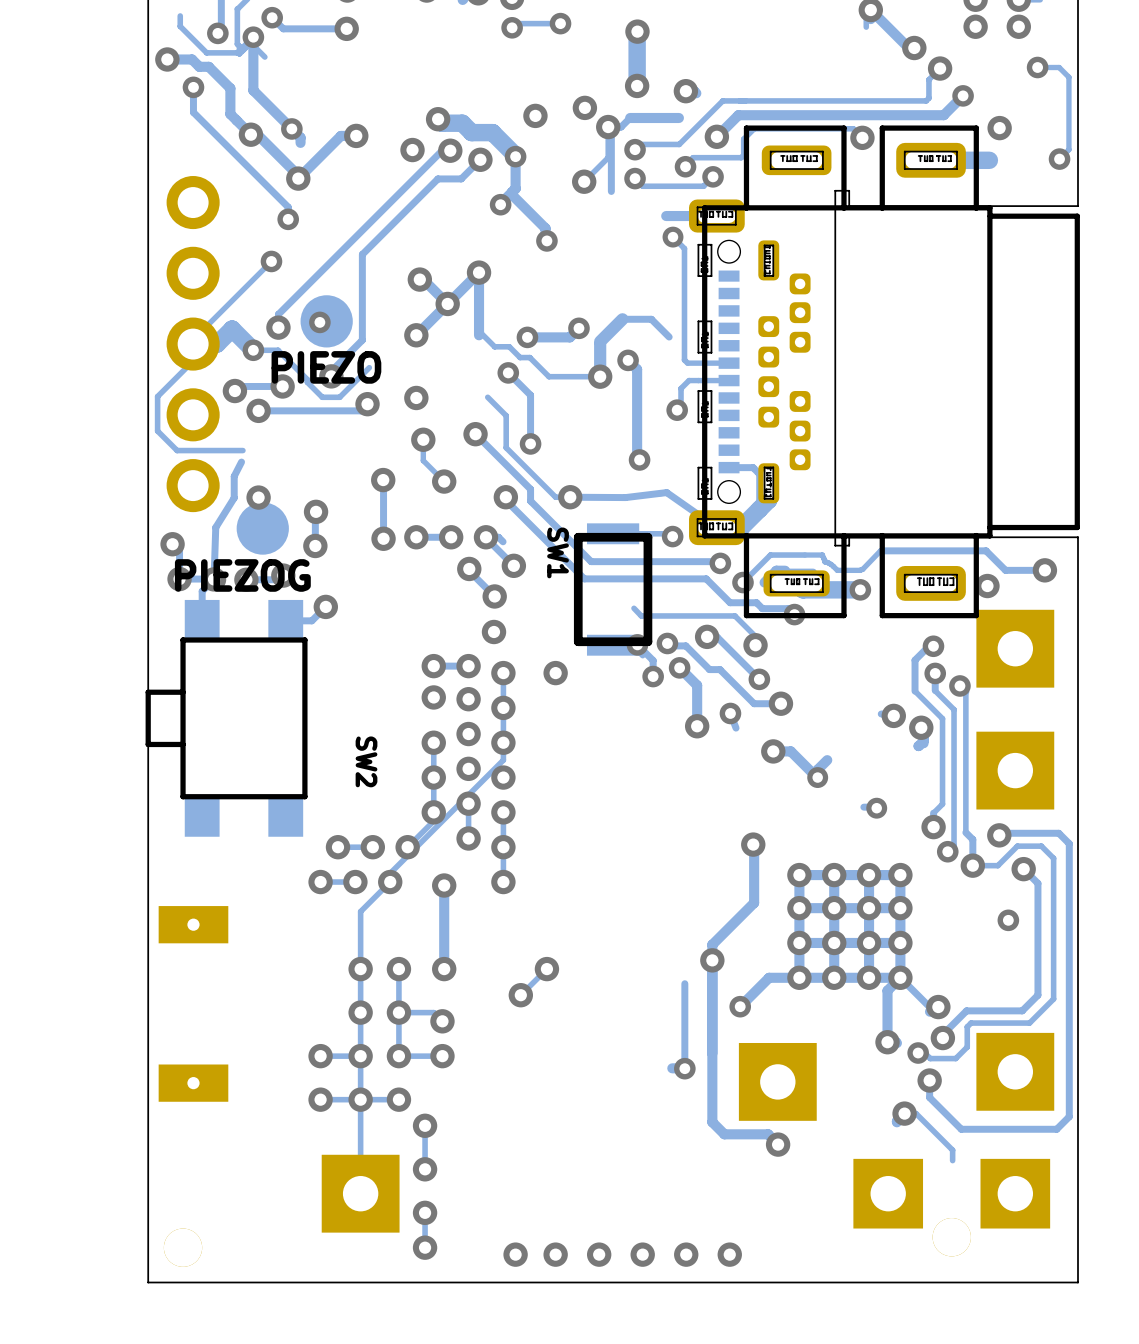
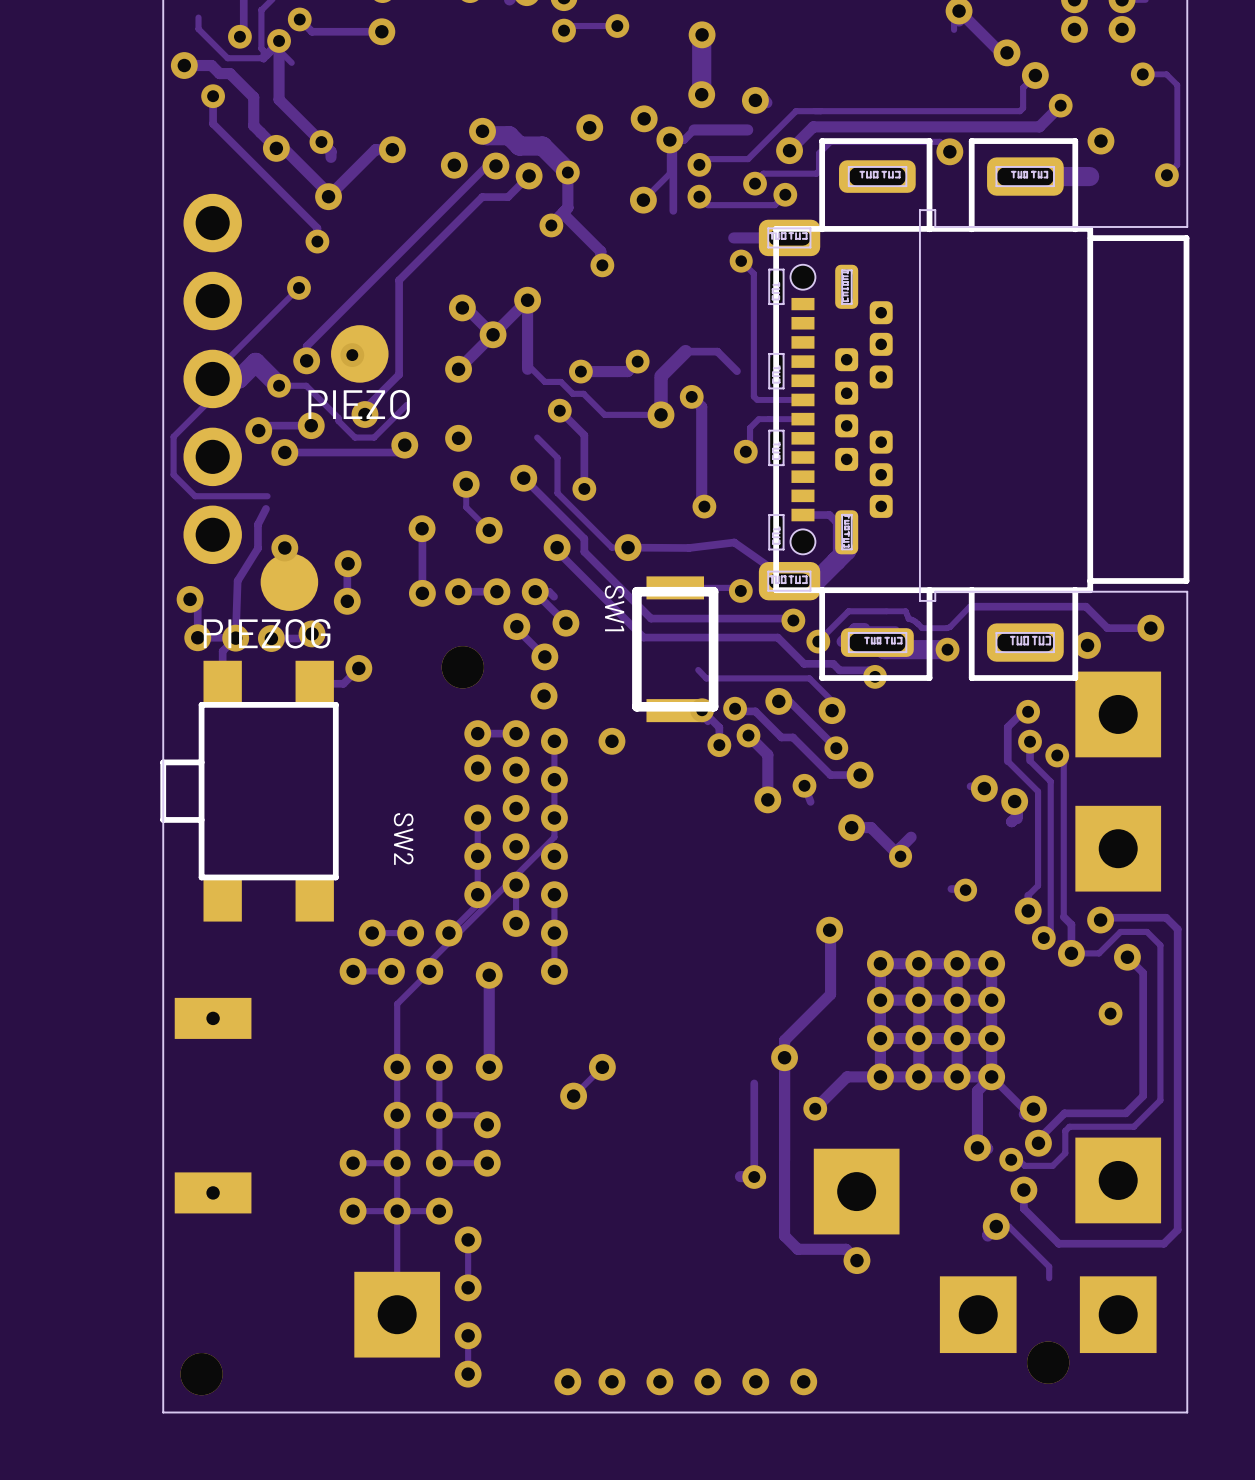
part: none -> (462, 667)

